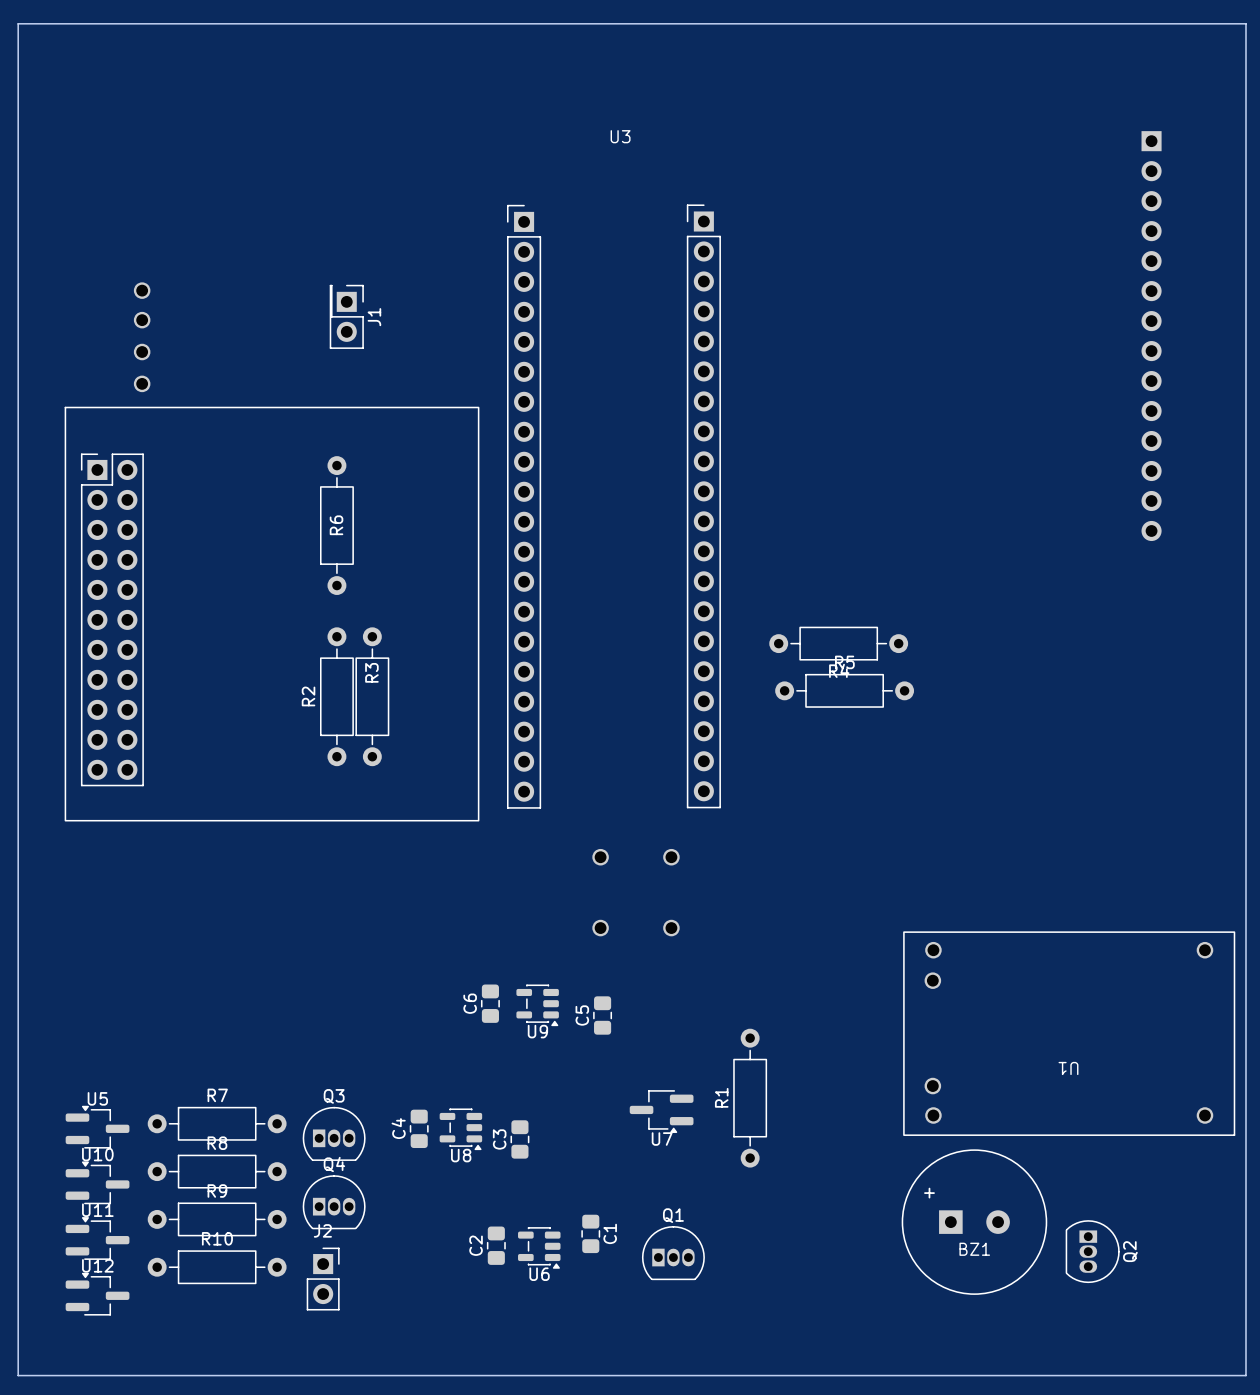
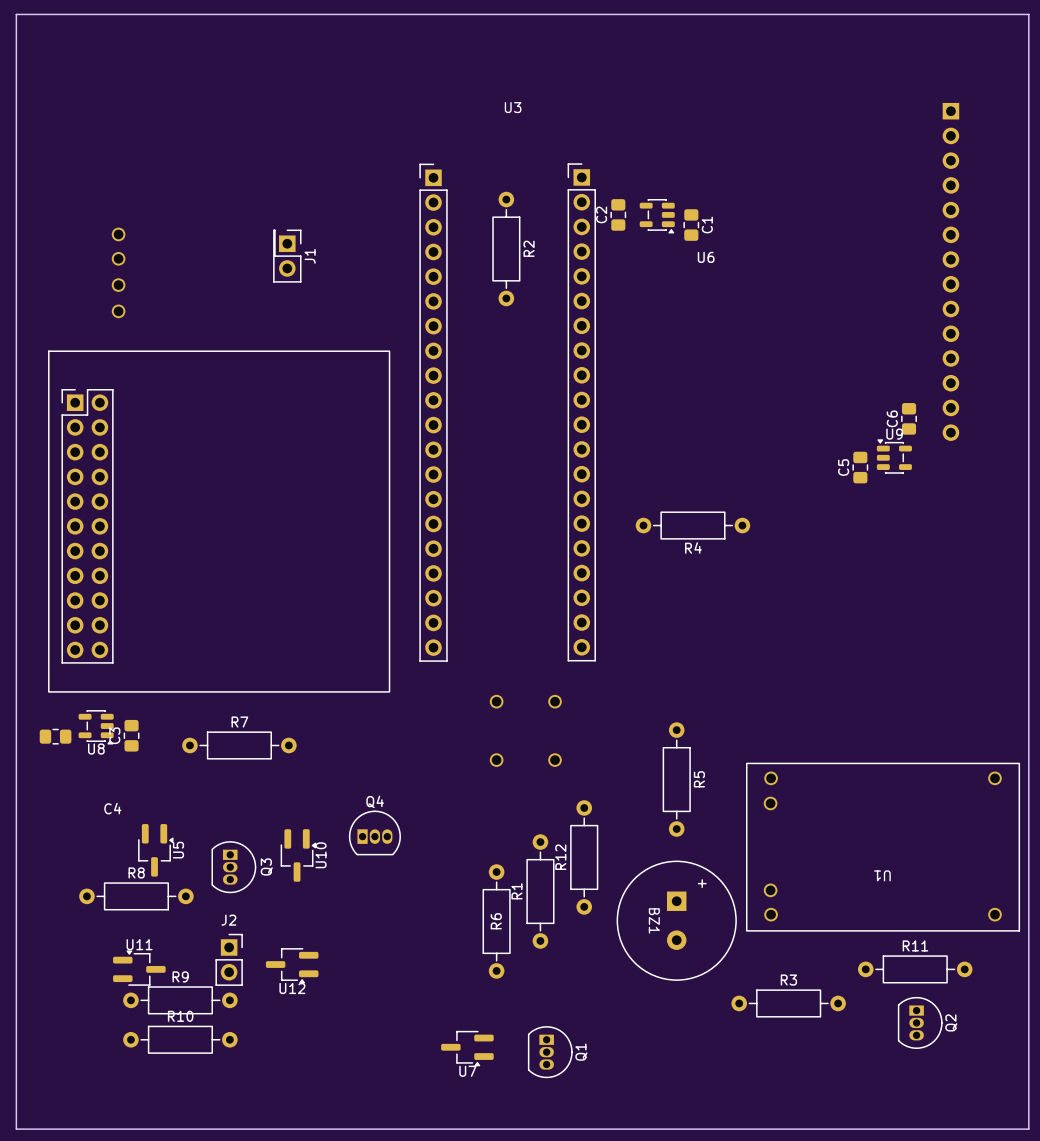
R6 position: (336, 525) -> (496, 921)
part position: (272, 614) -> (219, 521)
R5 rotation: 0° (844, 690) -> 90° clockwise (676, 779)
R5 position: (844, 690) -> (676, 779)
R2 name position: R2 (308, 696) -> R2 (529, 248)
R2 position: (336, 696) -> (506, 248)
R3 rotation: 0° (372, 696) -> 90° clockwise (788, 1003)
R3 position: (372, 696) -> (788, 1003)
C6 position: (490, 1003) -> (909, 418)
U9 rotation: 0° (537, 1005) -> 180° (894, 456)
U9 position: (537, 1005) -> (894, 456)
C5 position: (602, 1015) -> (860, 467)
R12: none -> (584, 857)
R1 position: (750, 1098) -> (540, 891)
U7 position: (661, 1111) -> (467, 1048)
R7 position: (217, 1123) -> (239, 745)
U5 rotation: 0° (97, 1127) -> 90° clockwise (155, 850)
U5 position: (97, 1127) -> (155, 850)
C4 name position: C4 (398, 1128) -> C4 (112, 808)
C4 rotation: 0° (419, 1128) -> 90° clockwise (55, 736)
C4 position: (419, 1128) -> (55, 736)
U8 position: (460, 1129) -> (96, 727)
Q3 rotation: 0° (334, 1133) -> 90° clockwise (233, 867)
Q3 position: (334, 1133) -> (233, 867)
C3 position: (519, 1139) -> (131, 735)
R8 position: (217, 1171) -> (136, 896)
R11: none -> (915, 969)
U10 rotation: 0° (97, 1182) -> 90° clockwise (298, 855)
U10 position: (97, 1182) -> (298, 855)
Q4 position: (334, 1202) -> (374, 832)
BZ1 rotation: 0° (974, 1222) -> 90° clockwise (676, 920)
BZ1 position: (974, 1222) -> (676, 920)
C1 position: (590, 1233) -> (691, 225)
U11 position: (97, 1238) -> (139, 968)
C2 position: (496, 1245) -> (618, 214)
U6 position: (539, 1247) -> (657, 216)
Q2 position: (1092, 1251) -> (920, 1022)
Q1 rotation: 0° (673, 1253) -> 90° clockwise (550, 1052)
U6 name position: U6 (539, 1274) -> U6 (706, 257)
J2 position: (323, 1279) -> (229, 959)
U12 rotation: 0° (97, 1294) -> 180° (292, 965)
U12 position: (97, 1294) -> (292, 965)

